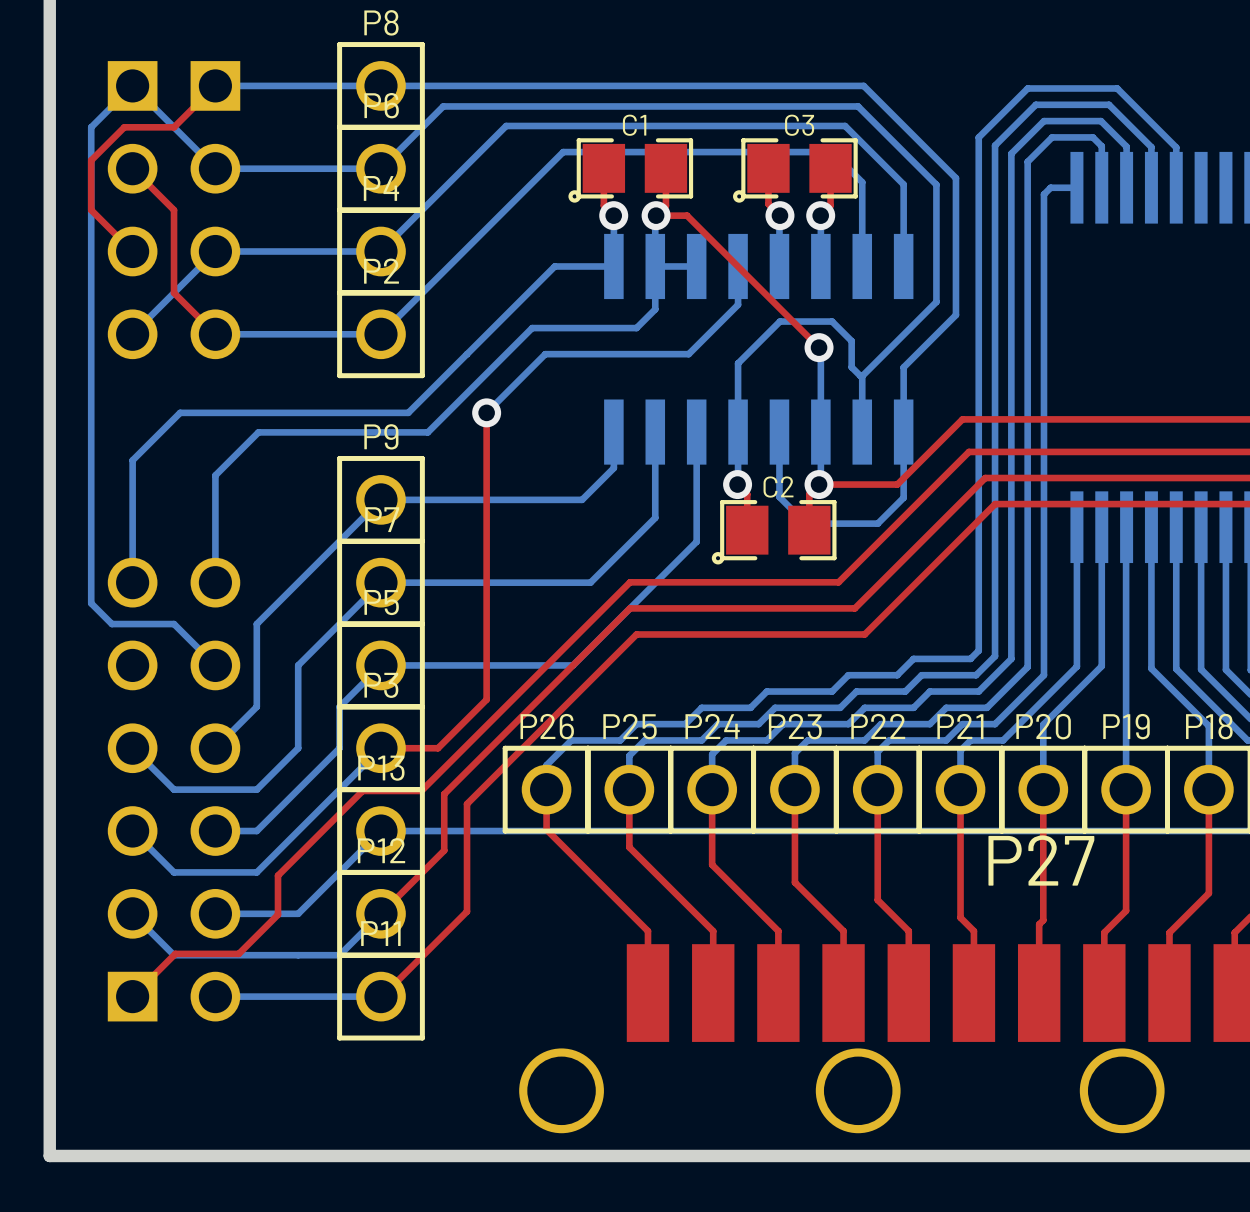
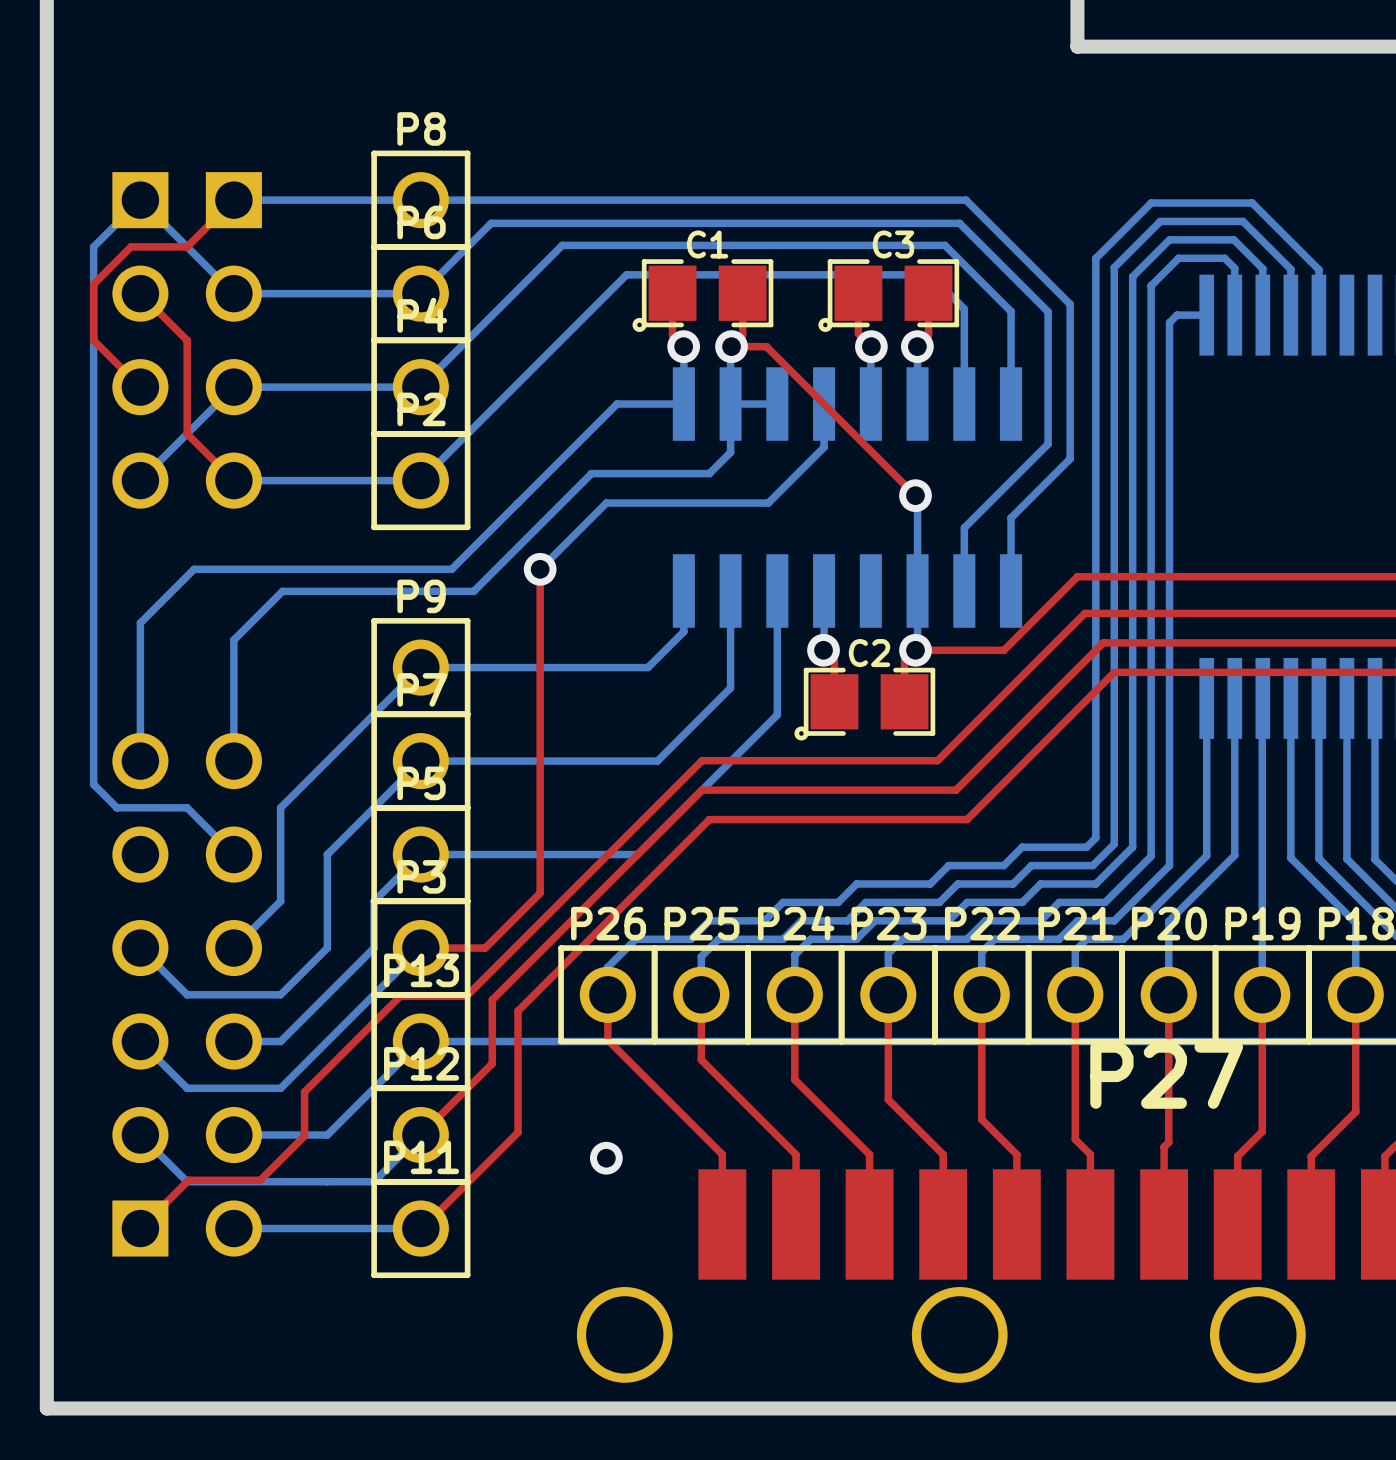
bottom track: (862, 376) (851, 367) (851, 341) (832, 321) (779, 321) (738, 363) (738, 432) -> none
bottom track: (779, 432) (779, 497) (806, 523) (877, 523) (903, 497) (903, 432) -> none
via: none -> (606, 1158)

